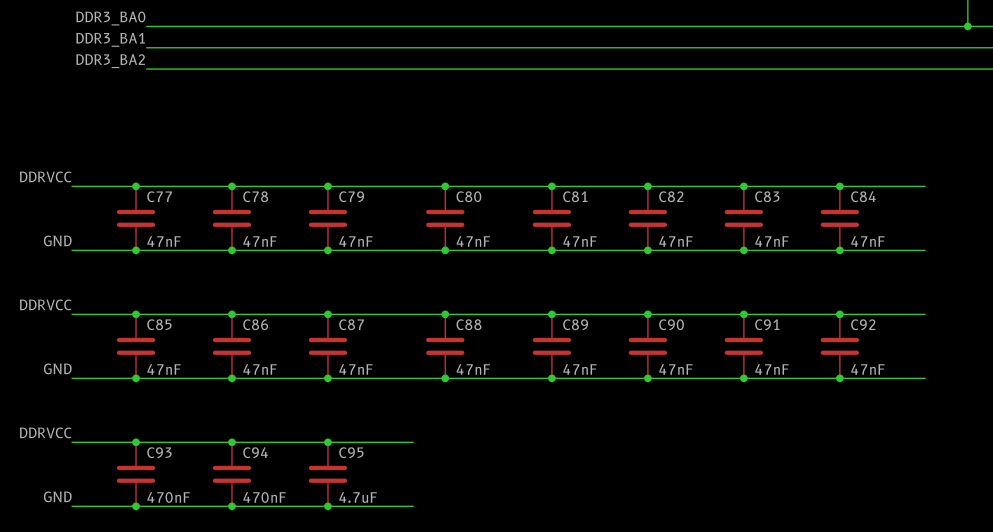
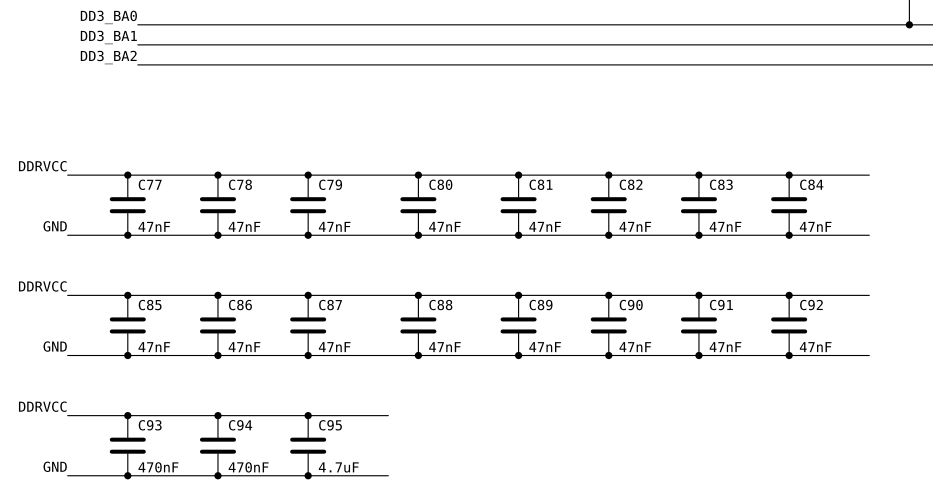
label: DDR3_BA0 (110, 18) -> DD3_BA0 (108, 17)
label: DDR3_BA1 (110, 39) -> DD3_BA1 (108, 37)
label: DDR3_BA2 (110, 61) -> DD3_BA2 (108, 57)

